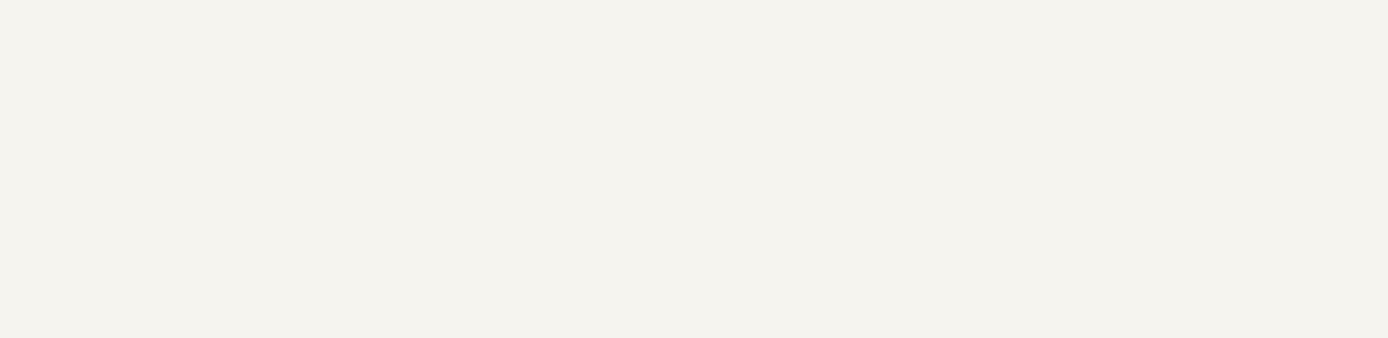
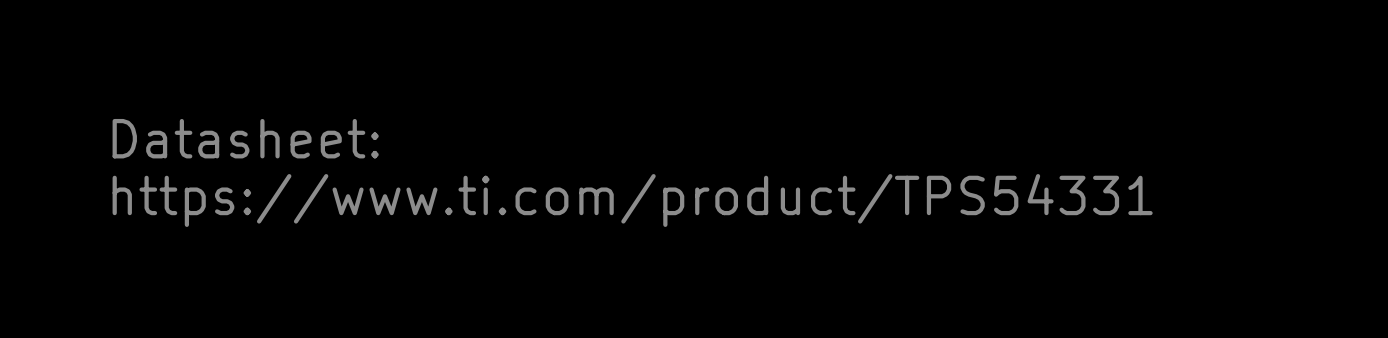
text: none -> Datasheet: (245, 138)
text: none -> https://www.ti.com/product/TPS54331 (632, 200)

